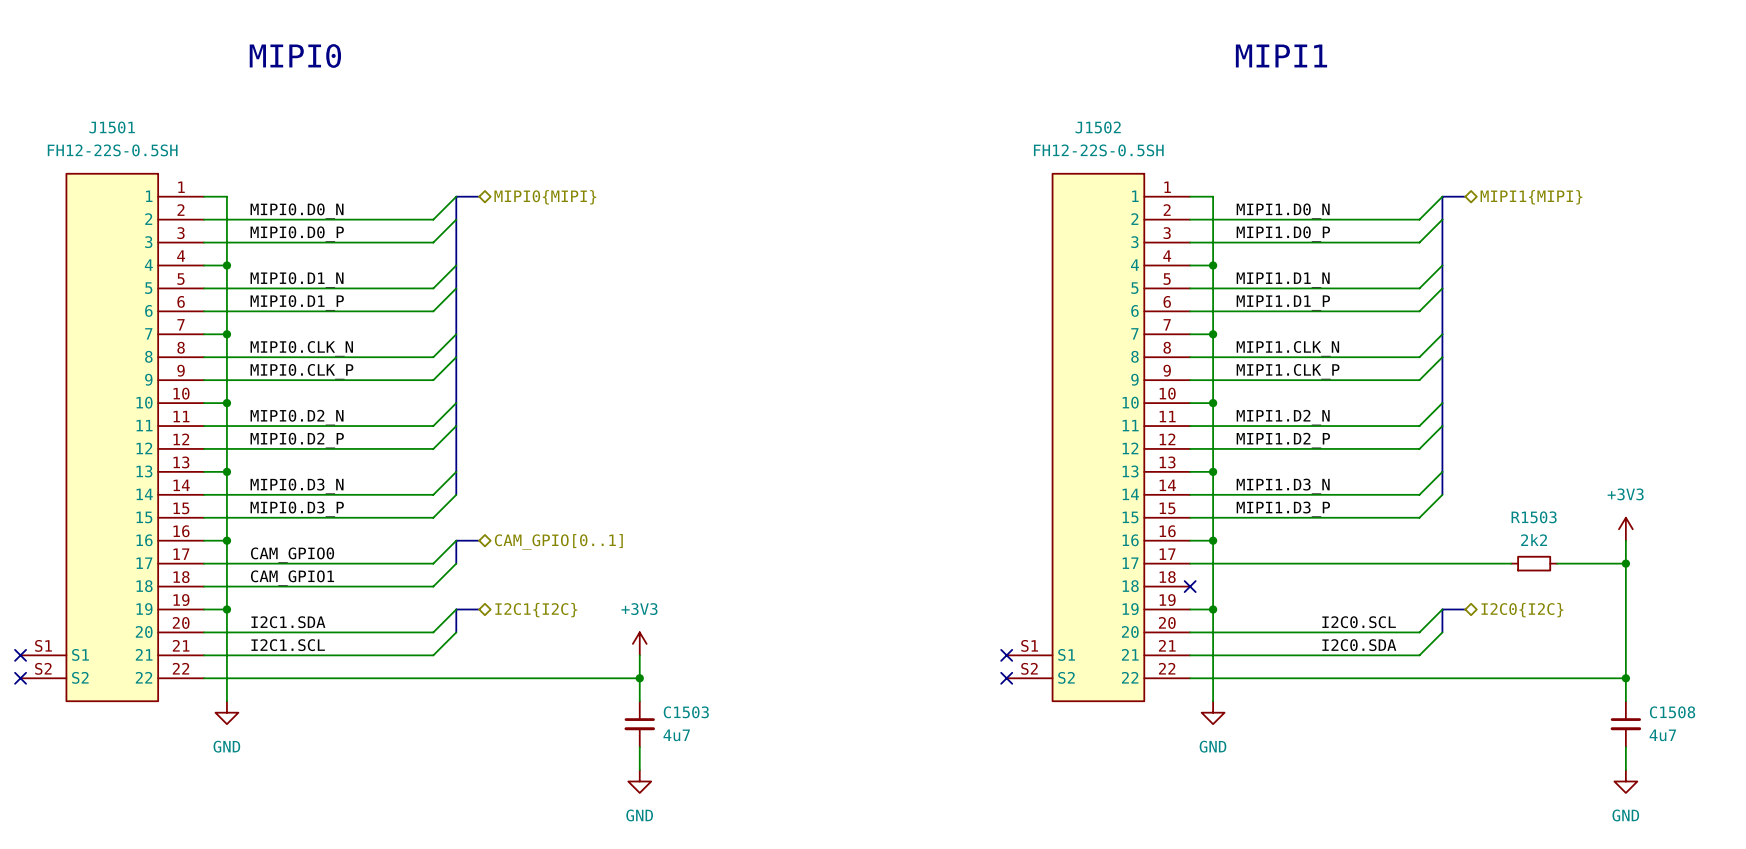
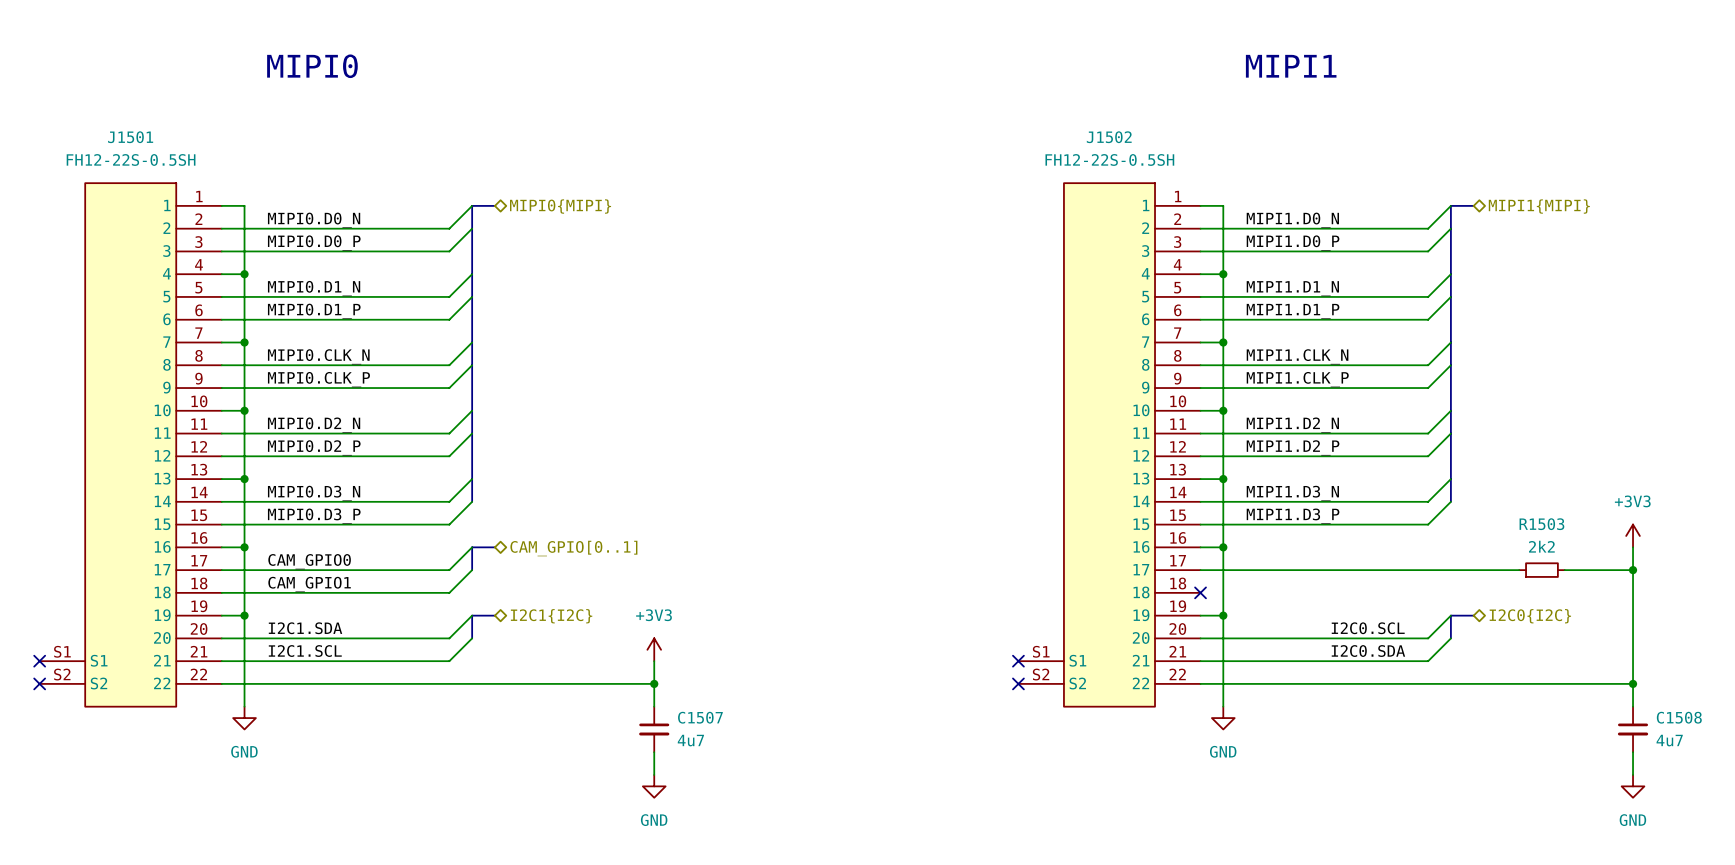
C1503 name: C1503 (686, 712) -> C1507 (700, 717)

